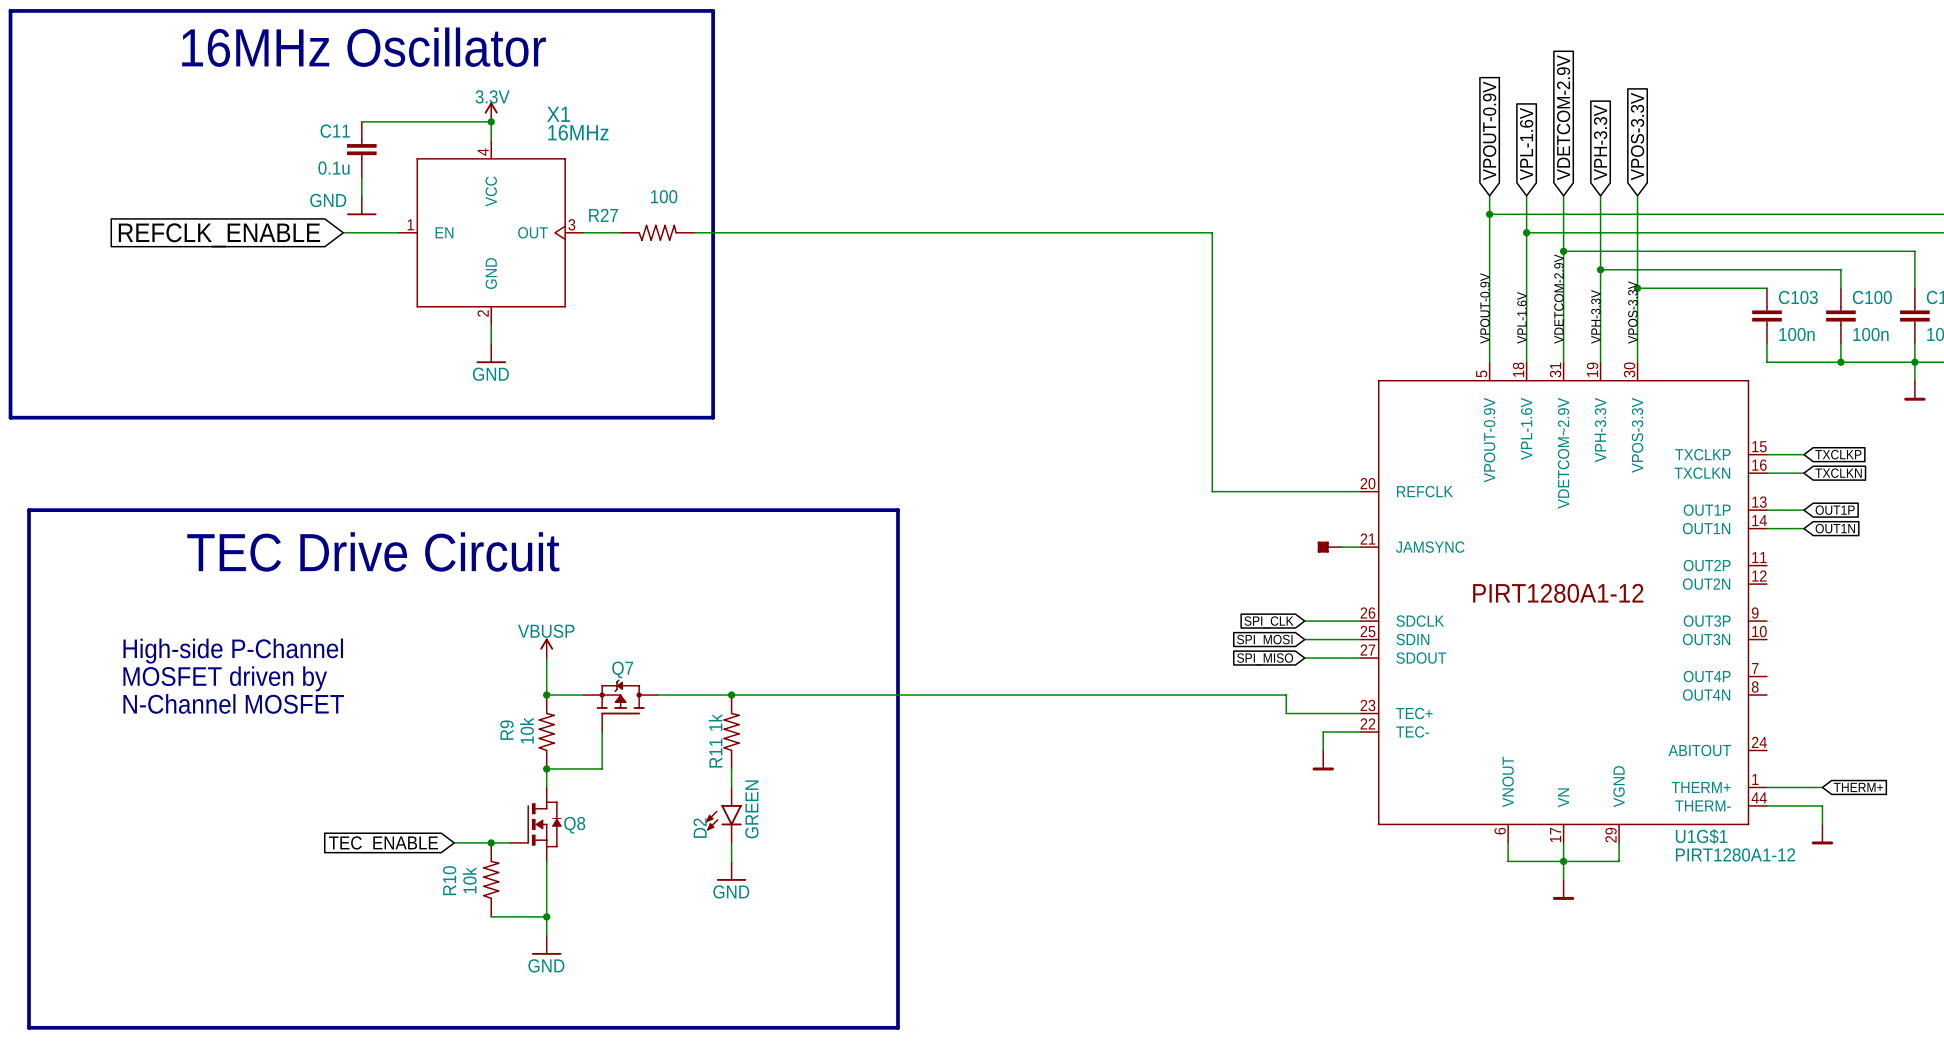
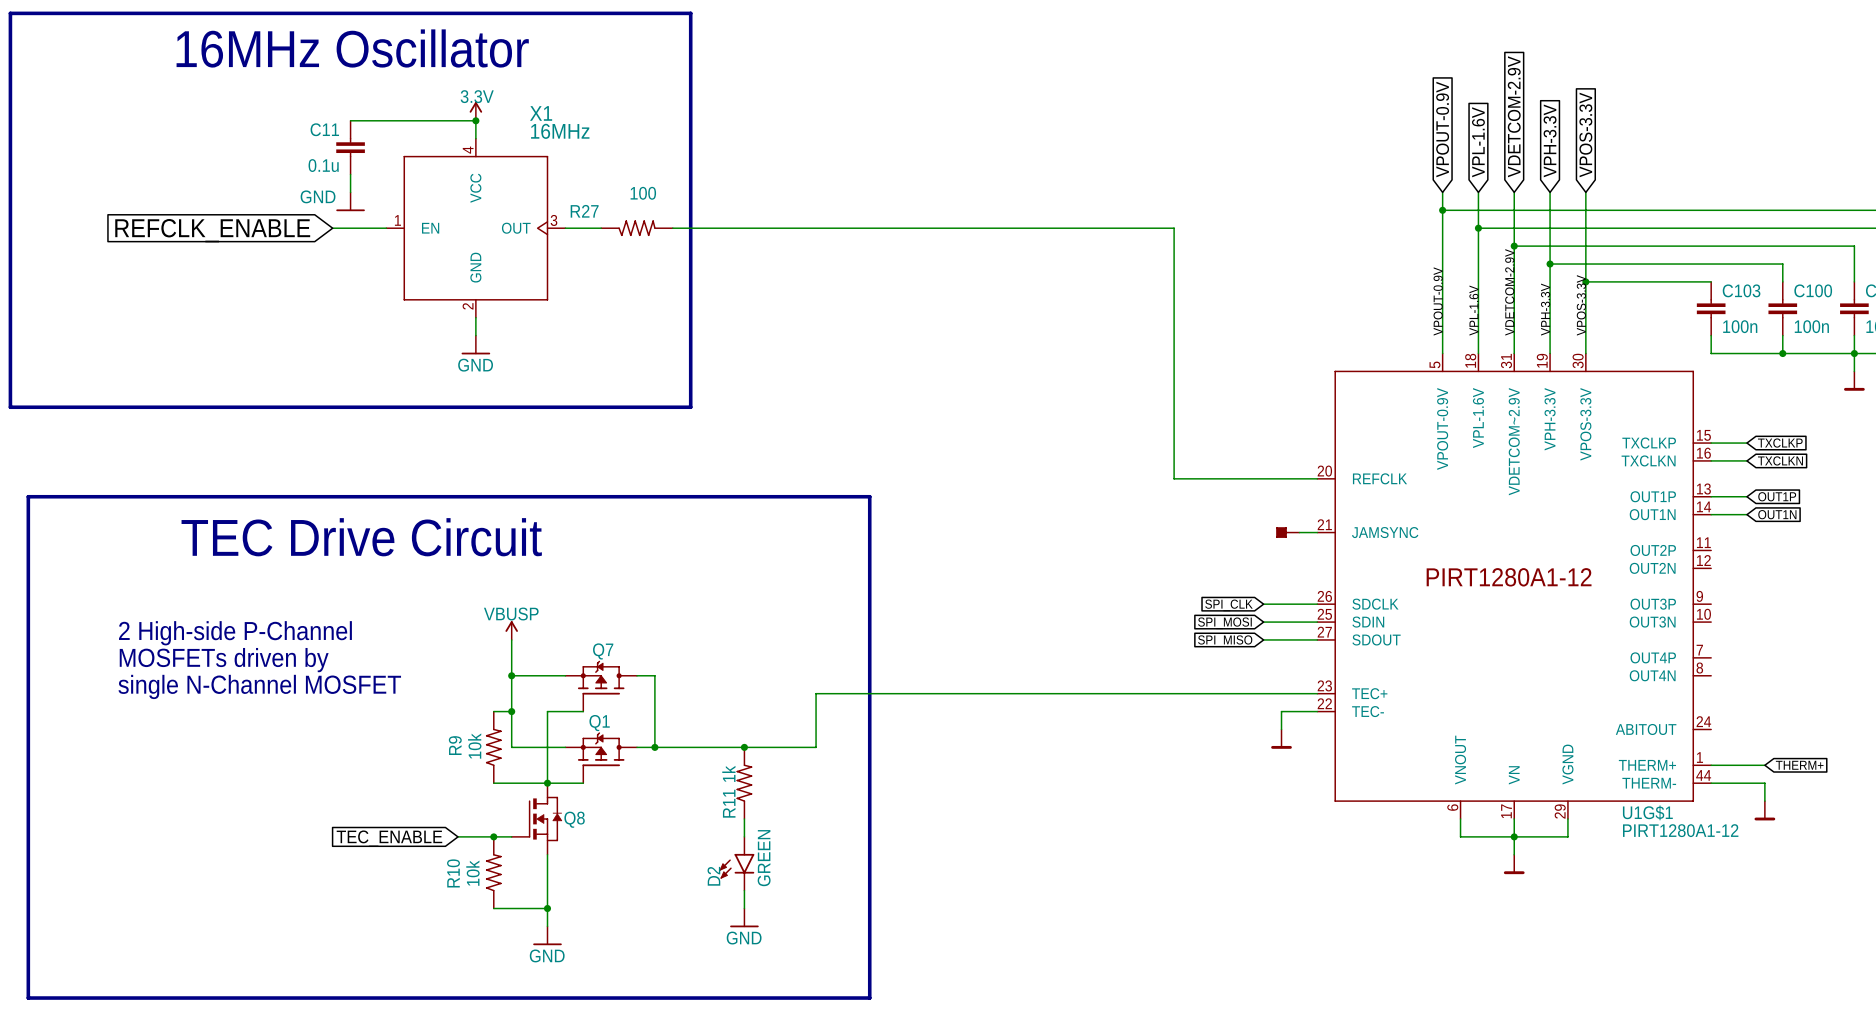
power symbol position: VBUSP (546, 648) -> VBUSP (511, 630)
text: High-side P-Channel (233, 651) -> 2 High-side P-Channel (235, 633)
wire: (546, 658) (546, 695) -> (511, 675) (529, 675)
text: MOSFET driven by (225, 678) -> MOSFETs driven by (224, 660)
junction position: (546, 695) -> (511, 675)
wire: (676, 695) (1286, 695) (1286, 713) -> (637, 747) (816, 747) (816, 693) (1245, 693)
wire: none -> (654, 675) (654, 747)
junction: (731, 695) -> none
text: N-Channel MOSFET (233, 703) -> single N-Channel MOSFET (259, 686)
wire: none -> (493, 711) (511, 711)
junction: none -> (511, 711)
R9 position: (546, 732) -> (493, 747)
wire: (602, 732) (602, 768) (583, 768) -> (583, 711) (547, 711) (547, 783)
R11 position: (731, 732) -> (744, 783)
wire: (546, 768) (546, 787) -> (529, 747) (511, 747) (511, 639)
junction: (546, 768) -> none
junction: none -> (654, 747)
wire: (731, 768) (731, 787) -> (744, 819) (744, 836)
junction: none -> (744, 747)
Q1: none -> (601, 757)
wire: none -> (493, 783) (583, 783)
junction: none -> (547, 783)
D2 position: (723, 815) -> (736, 863)
Q8 position: (535, 824) -> (536, 819)
wire: (454, 842) (509, 842) -> (457, 836) (511, 836)
junction position: (491, 842) -> (493, 836)
wire: (731, 842) (731, 861) -> (744, 890) (744, 908)
global label position: TEC_ENABLE (383, 844) -> TEC_ENABLE (389, 838)
wire: (546, 861) (546, 935) -> (547, 854) (547, 926)
power symbol position: GND (731, 871) -> GND (744, 917)
R10 position: (491, 879) -> (493, 872)
wire: (491, 916) (546, 916) -> (493, 908) (547, 908)
junction position: (546, 916) -> (547, 908)
power symbol position: GND (546, 945) -> GND (547, 935)

